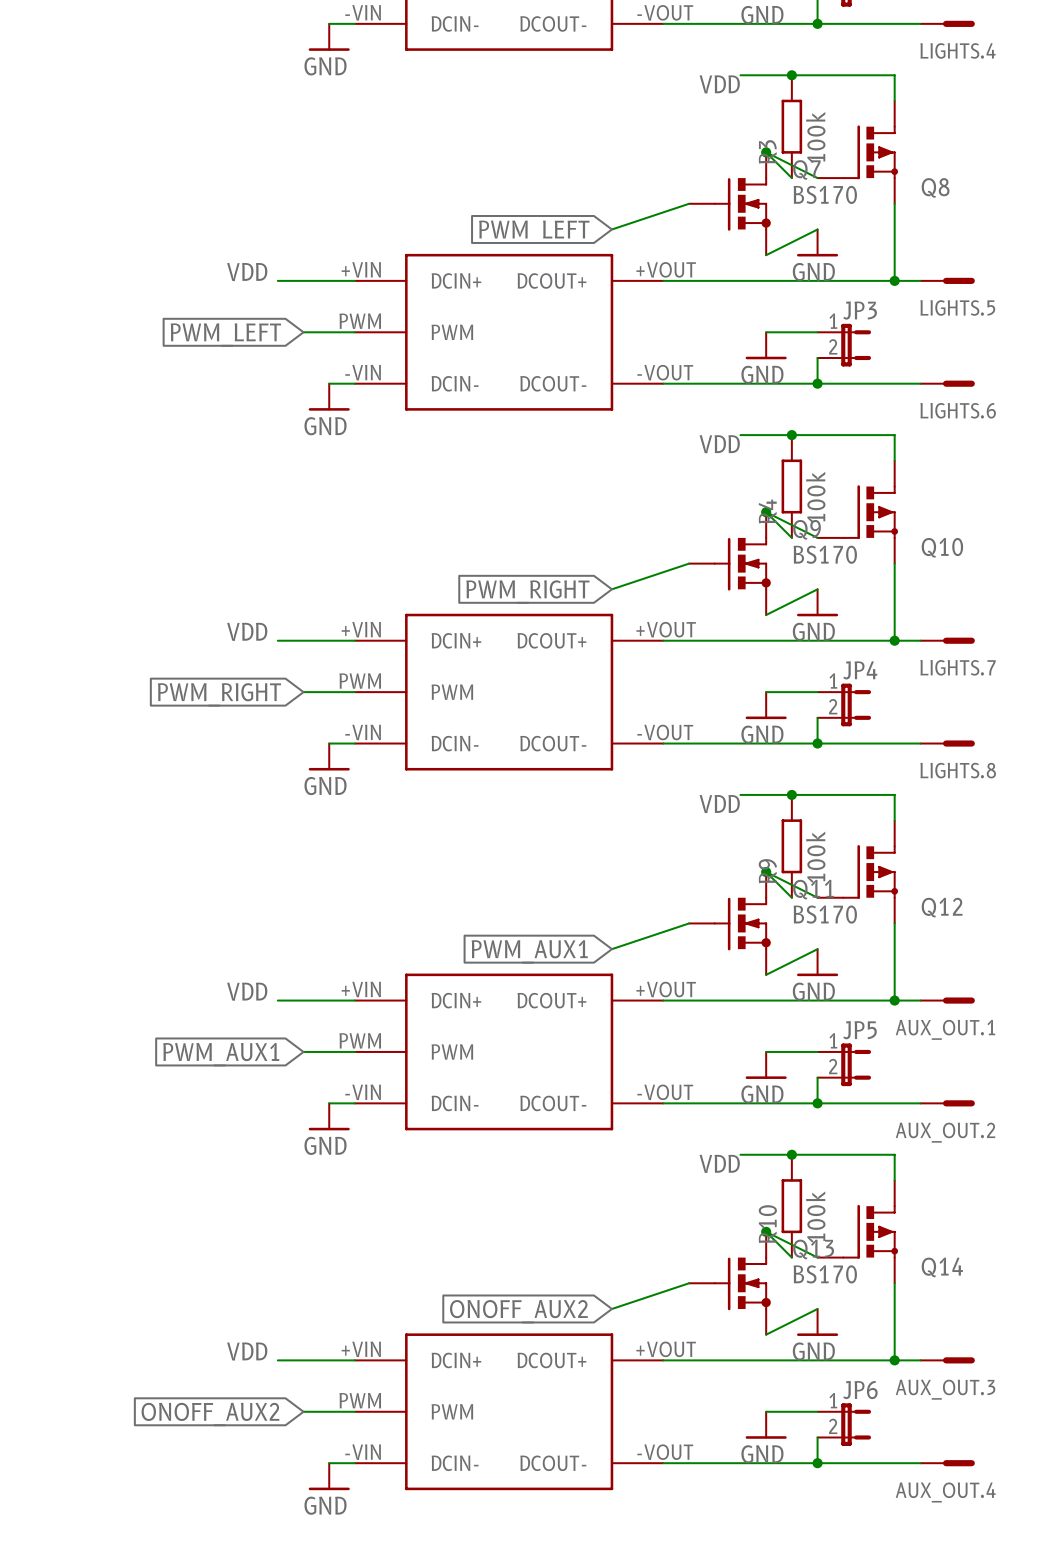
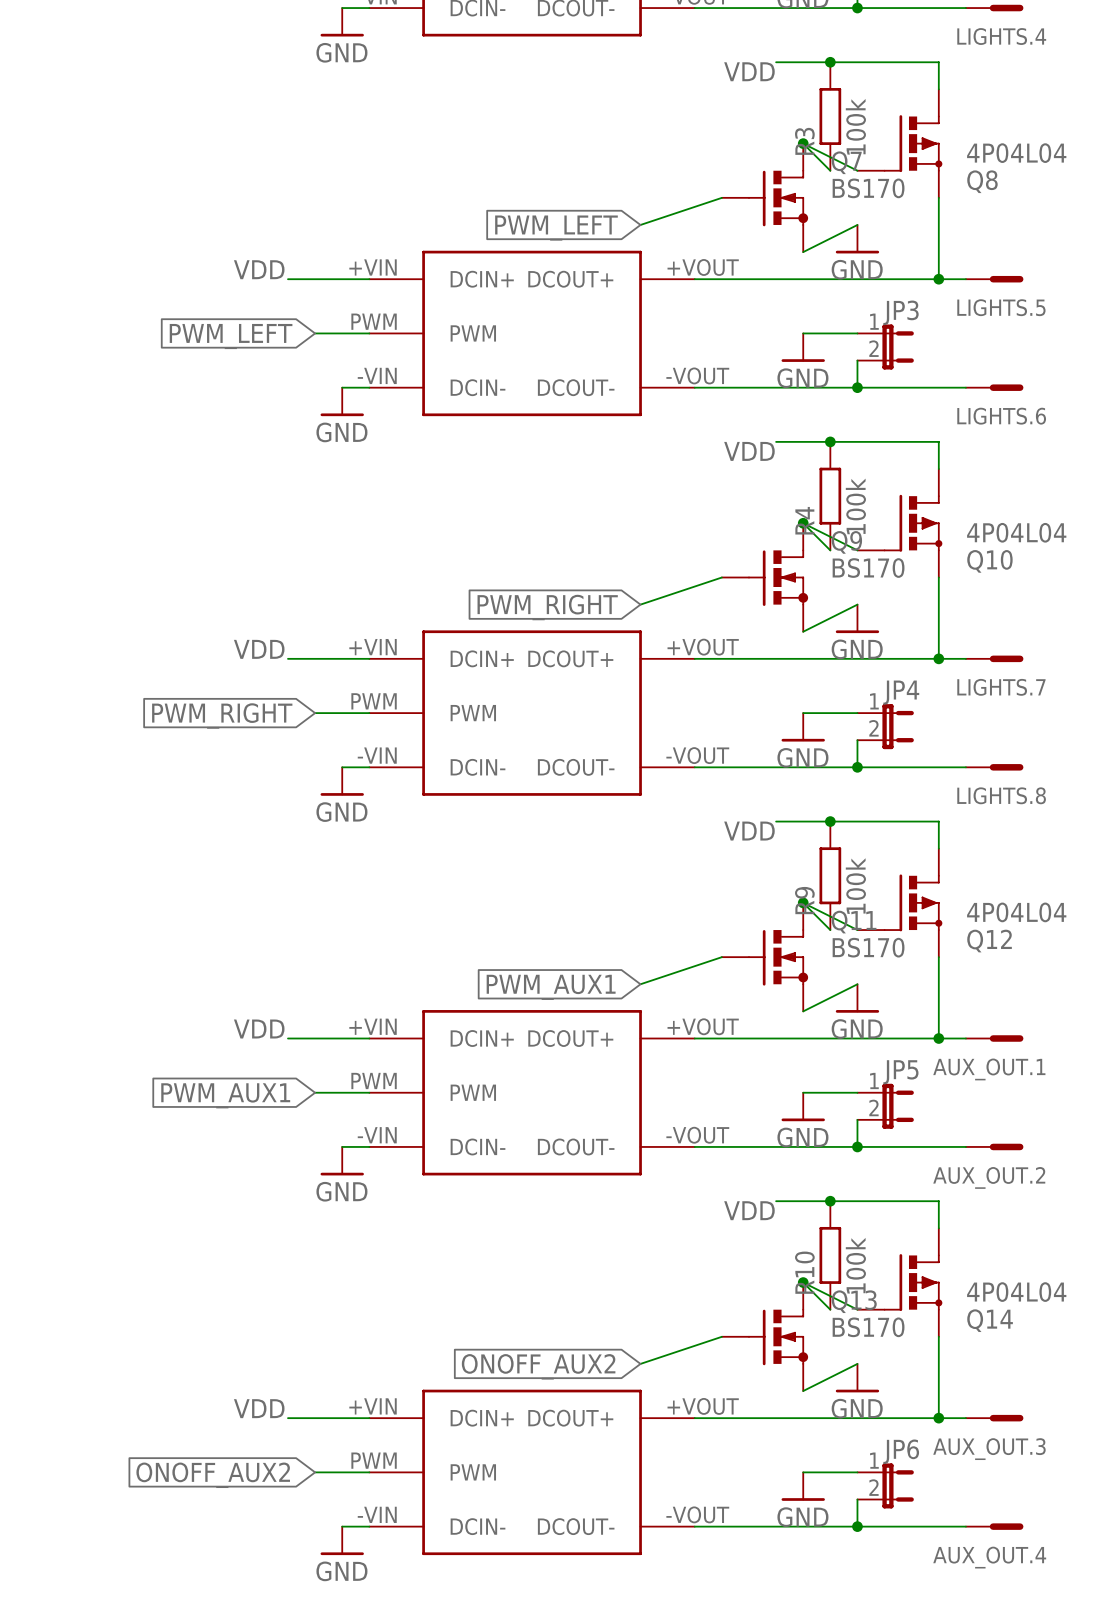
Q8 value: none -> 4P04L04 (1016, 153)
Q10 value: none -> 4P04L04 (1016, 532)
Q12 value: none -> 4P04L04 (1016, 912)
Q14 value: none -> 4P04L04 (1016, 1292)

